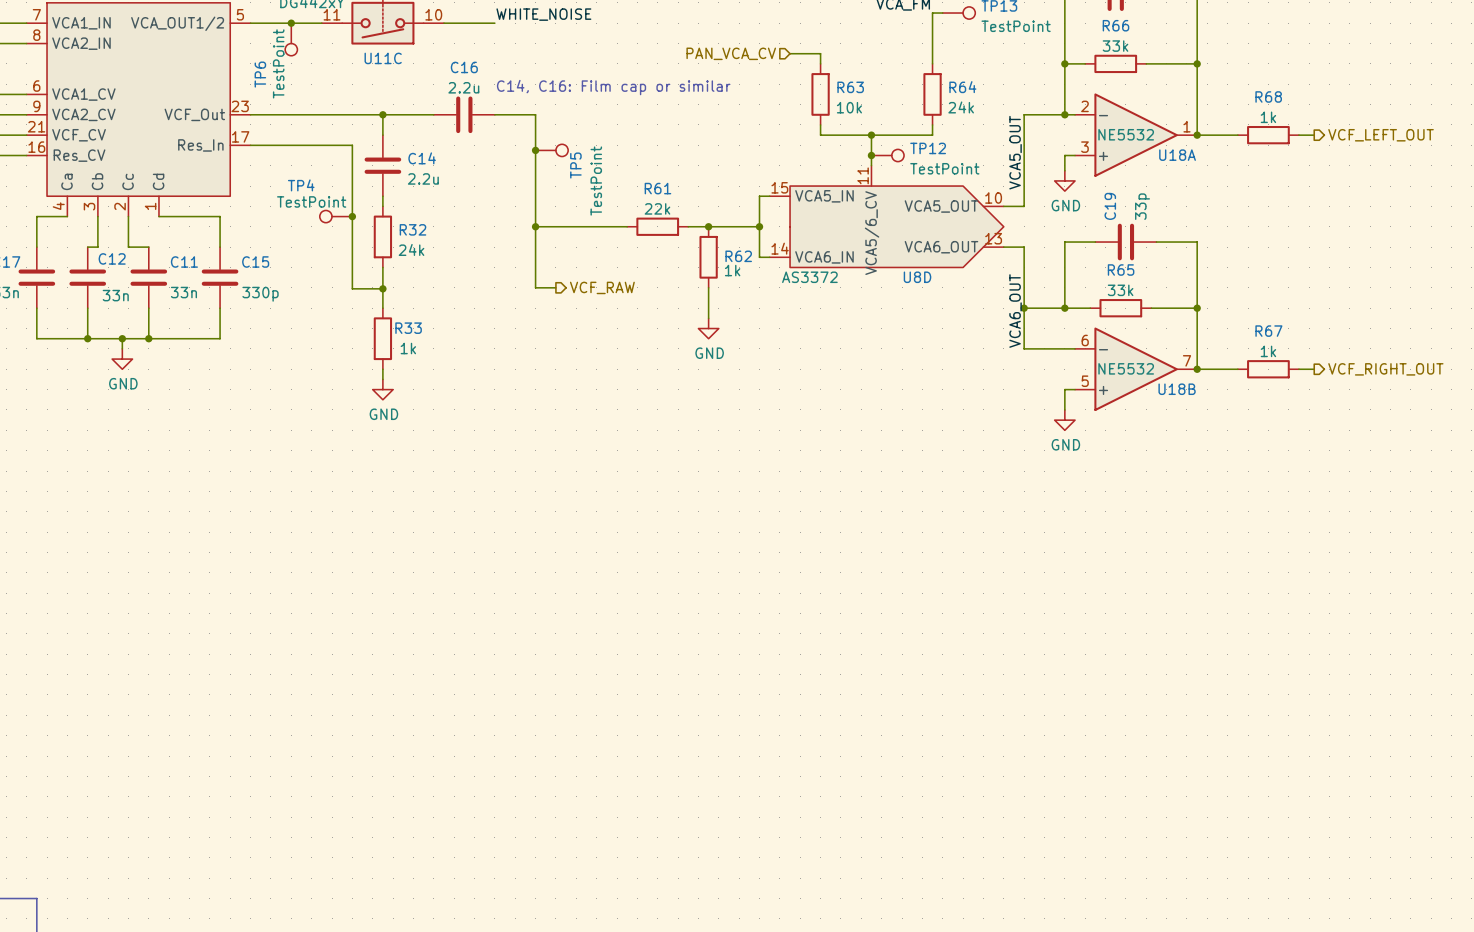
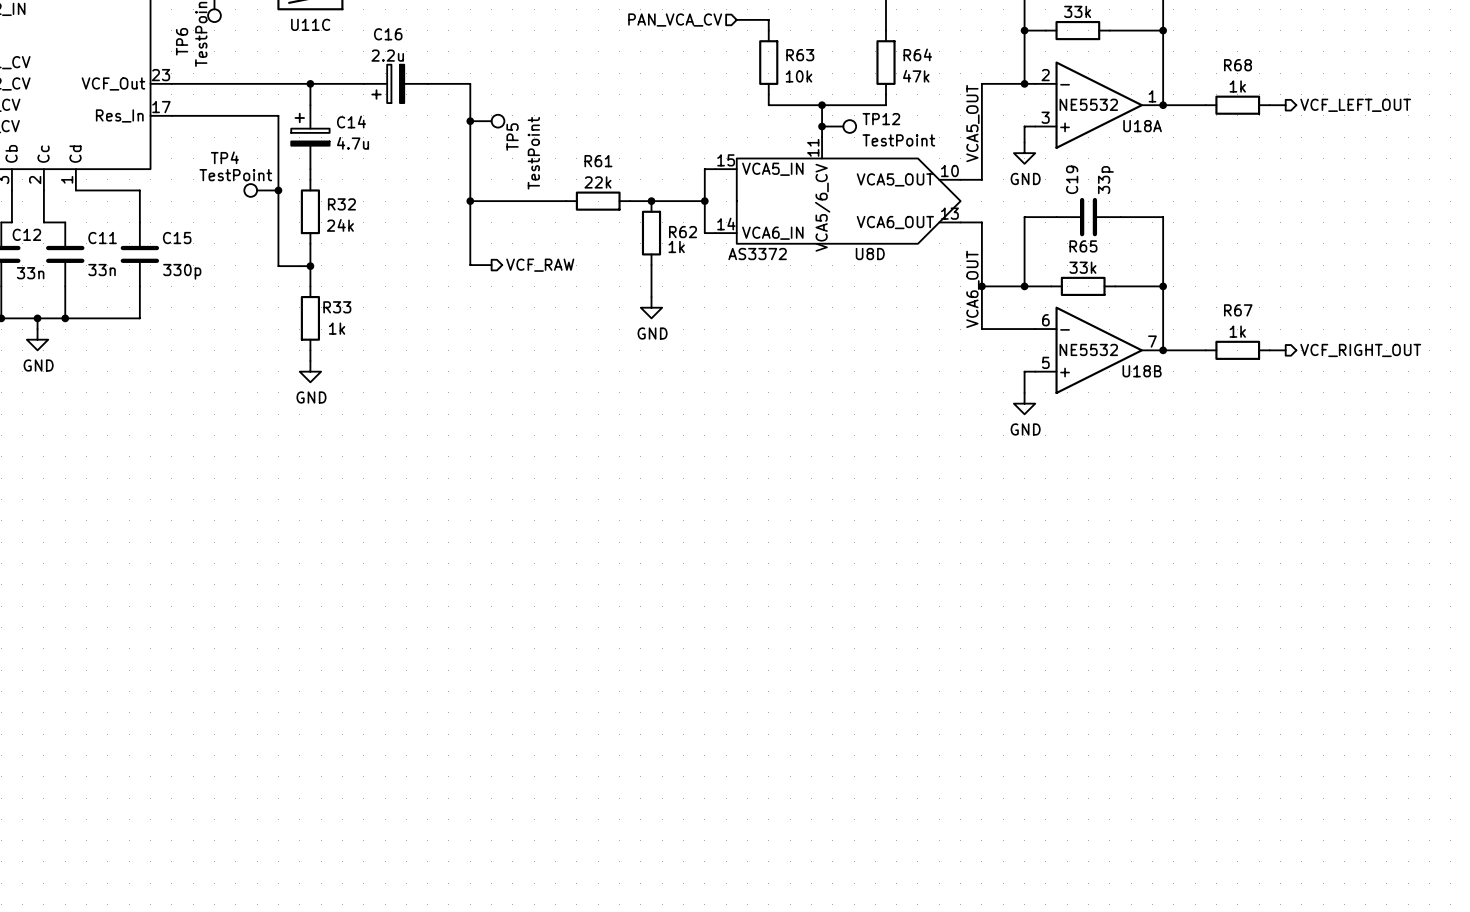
text: C14, C16: Film cap or similar (613, 87) -> none
C16 symbol: [433, 96, 495, 134] -> [363, 64, 428, 104]
R64 value: 24k (961, 107) -> 47k (916, 76)
C14 symbol: [364, 135, 402, 197] -> [291, 105, 330, 170]
C14 value: 2.2u (423, 178) -> 4.7u (353, 143)

